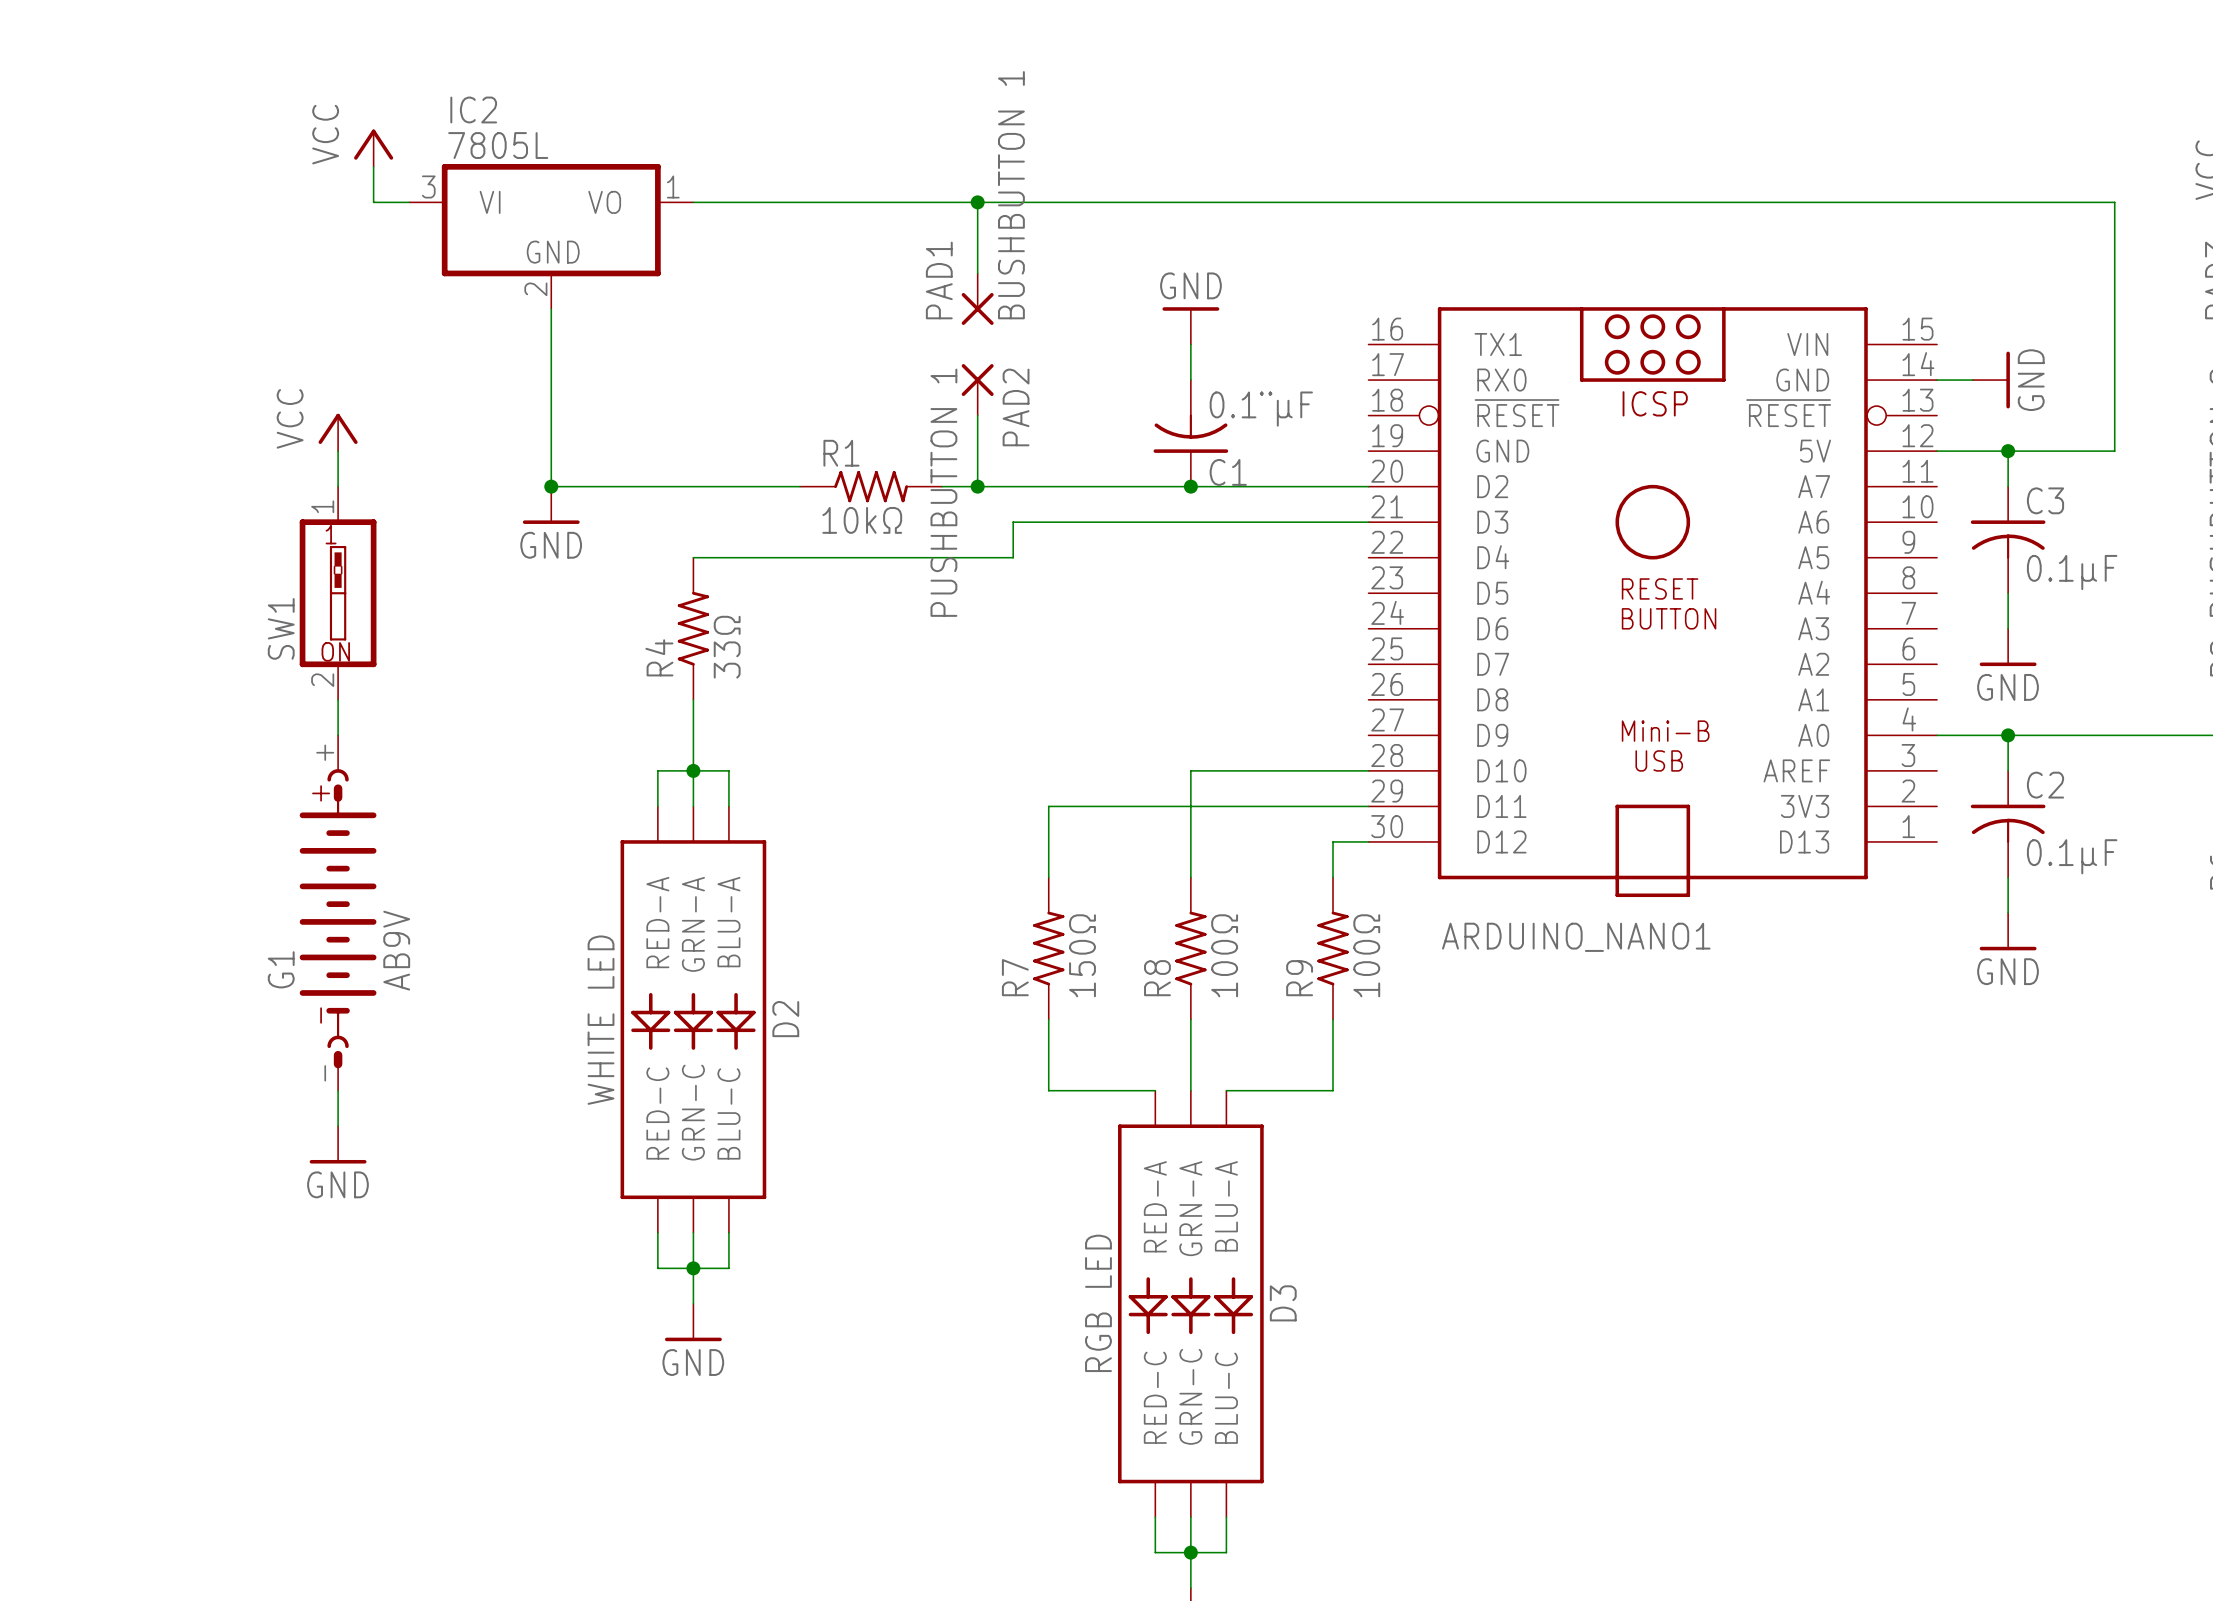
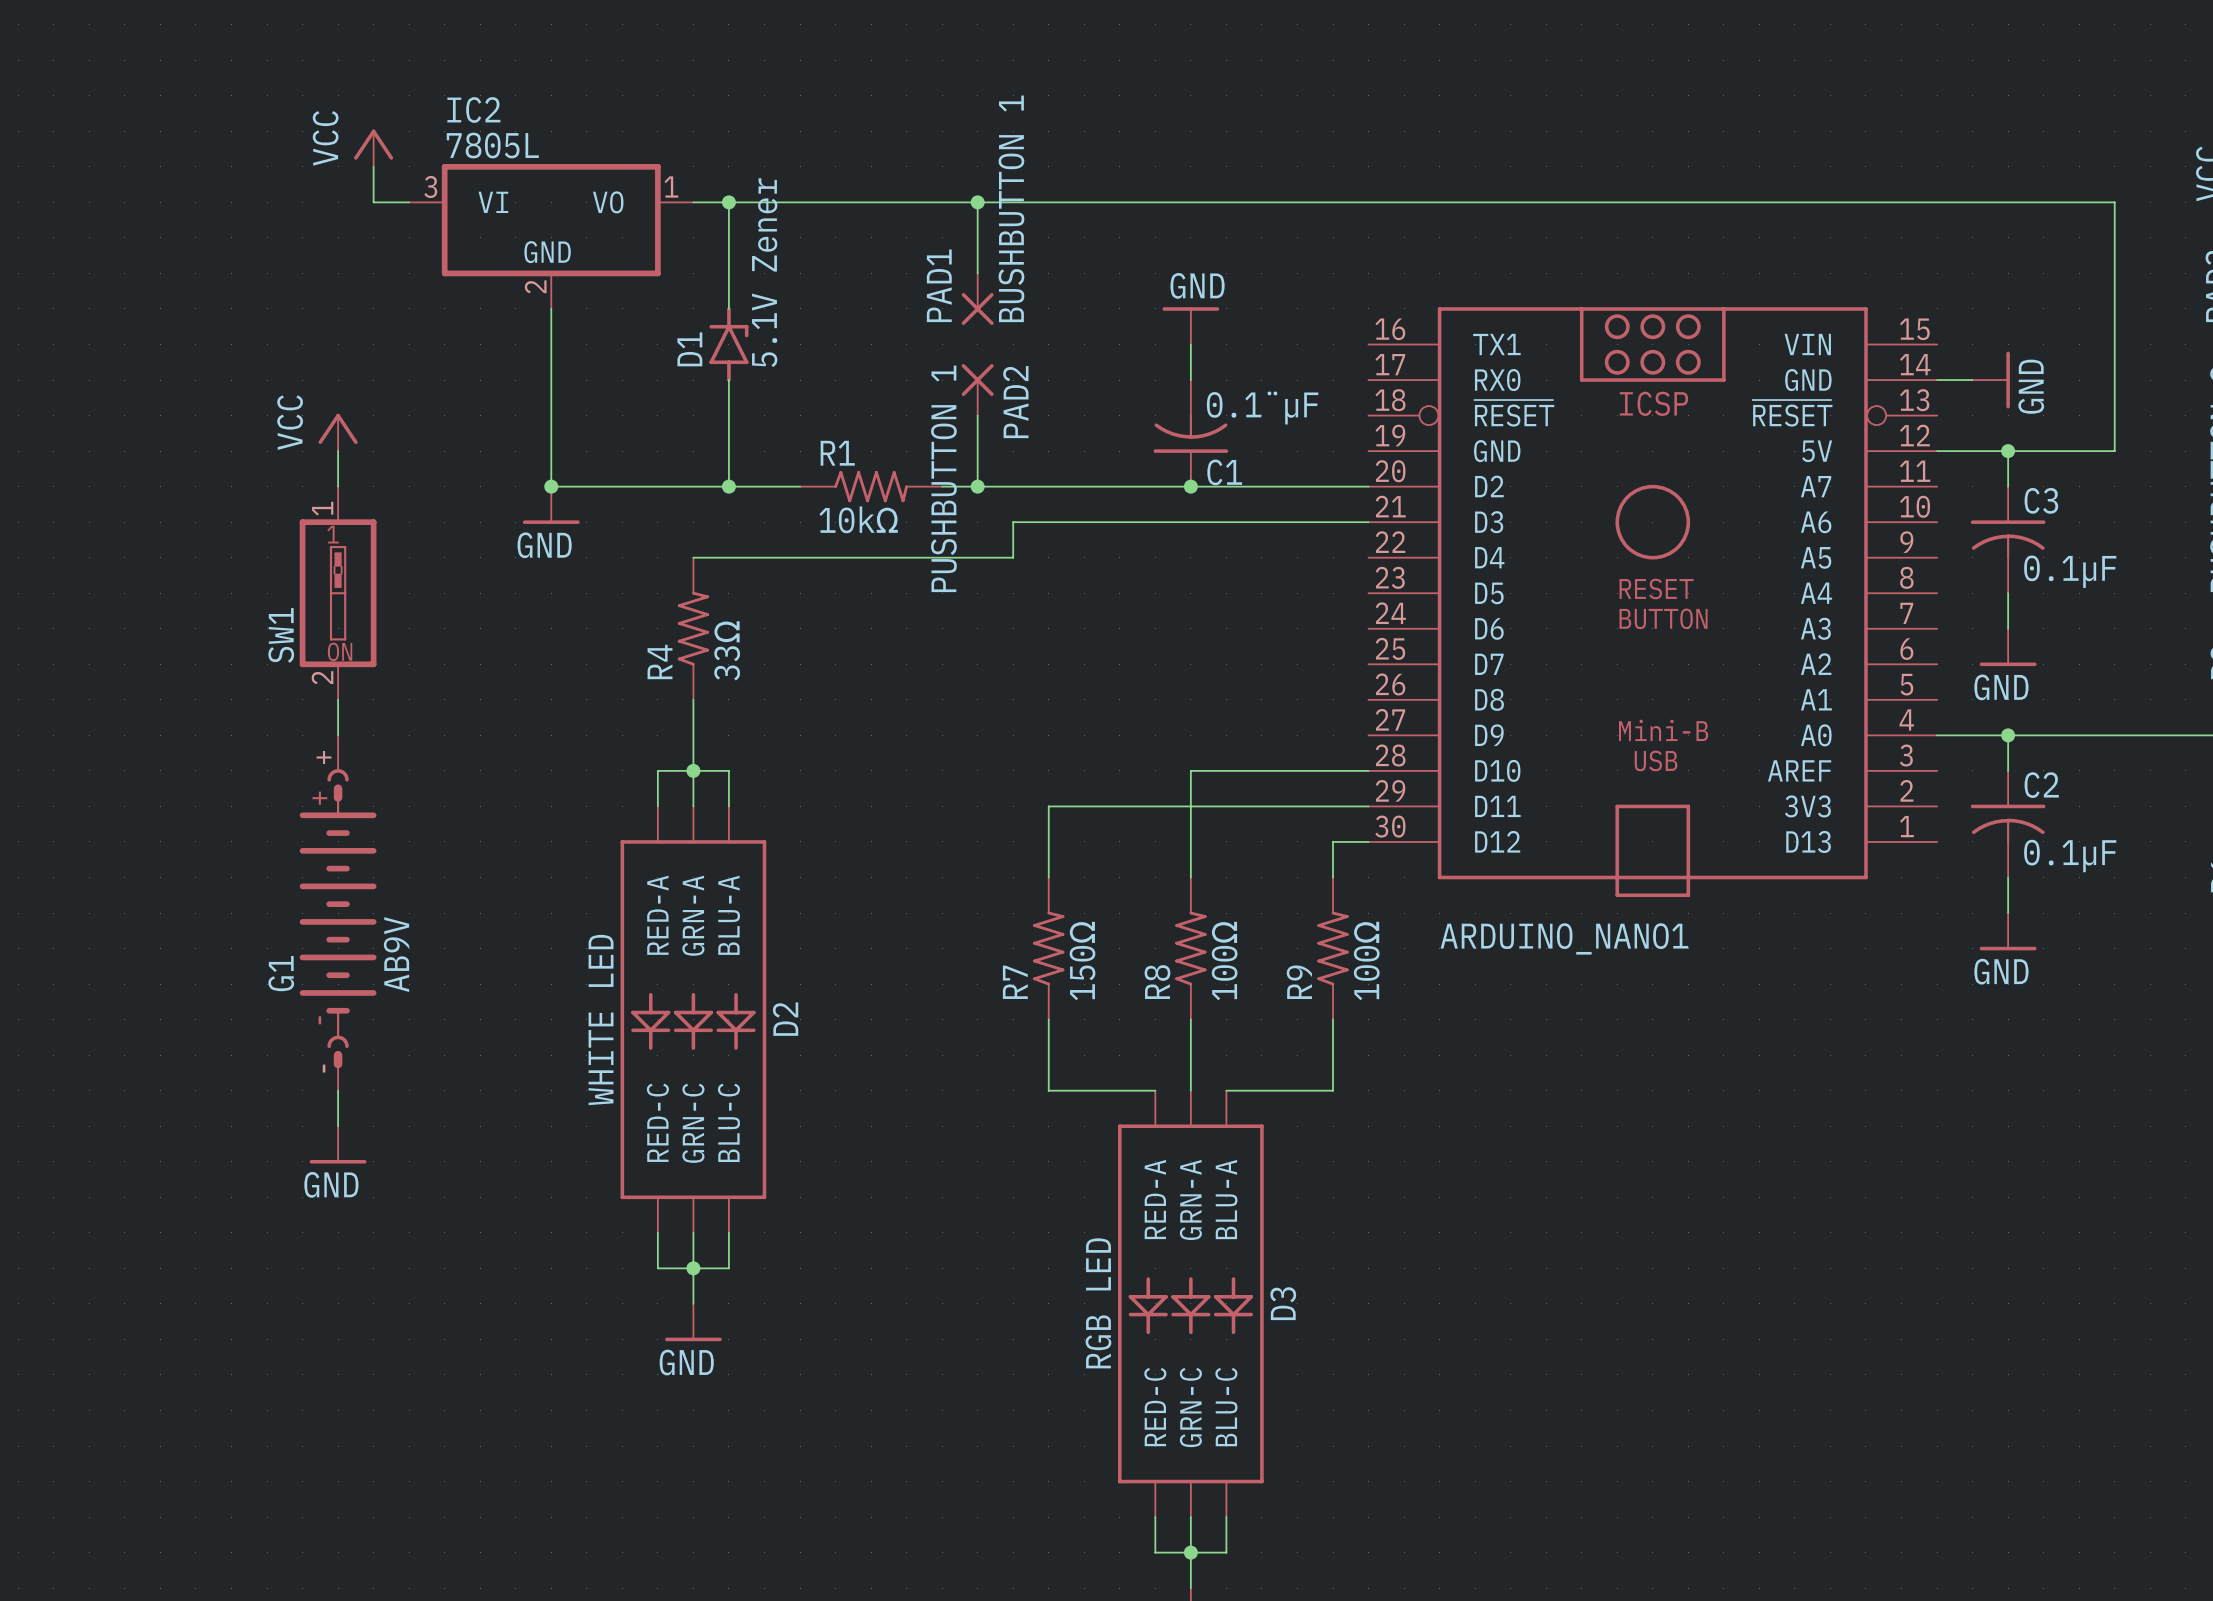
wire: none -> (728, 202) (728, 308)
junction: none -> (728, 202)
D1: none -> 5.1V Zener (728, 344)
wire: none -> (728, 380) (728, 486)
junction: none -> (728, 486)

